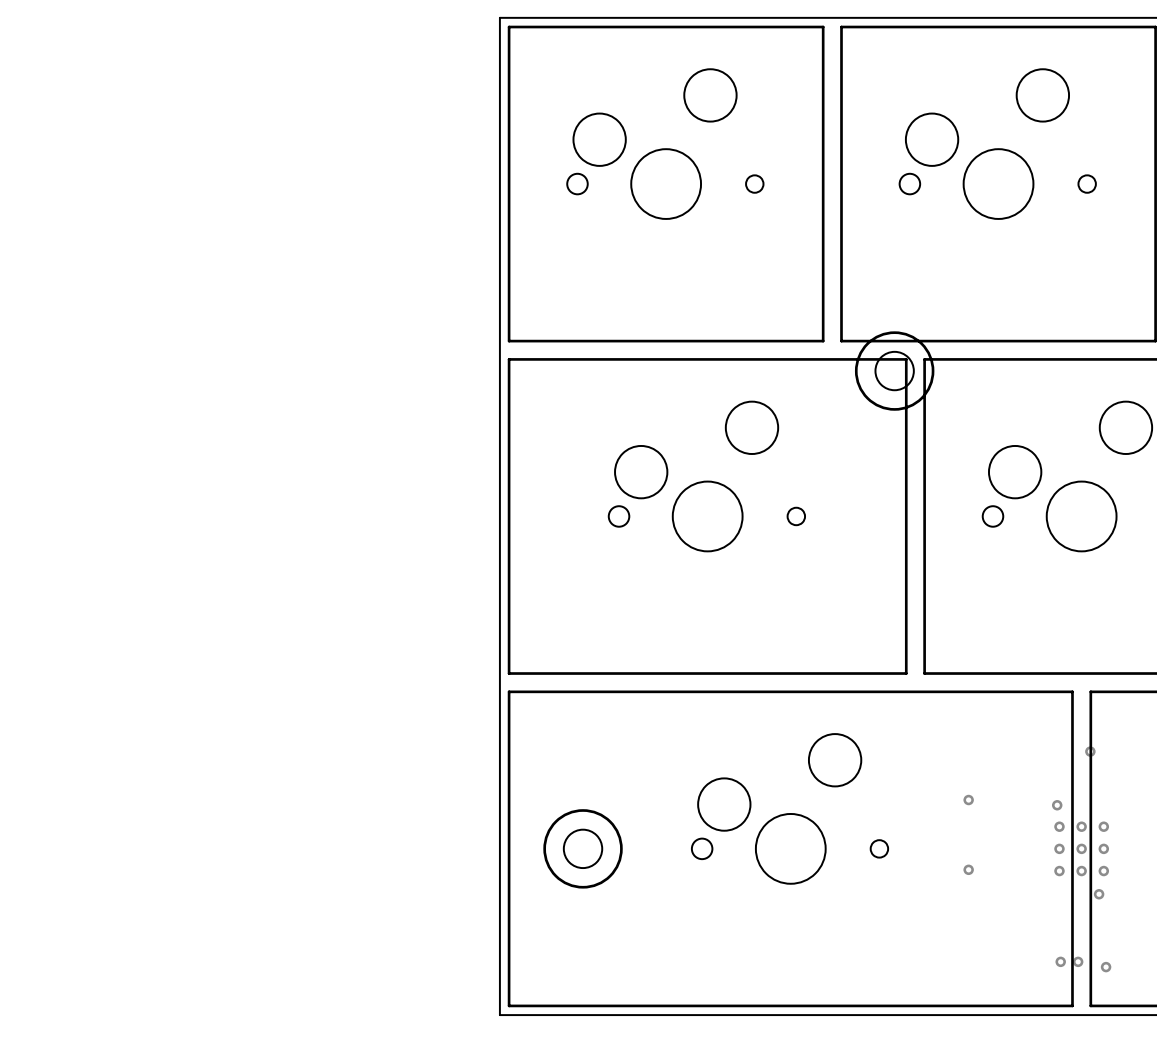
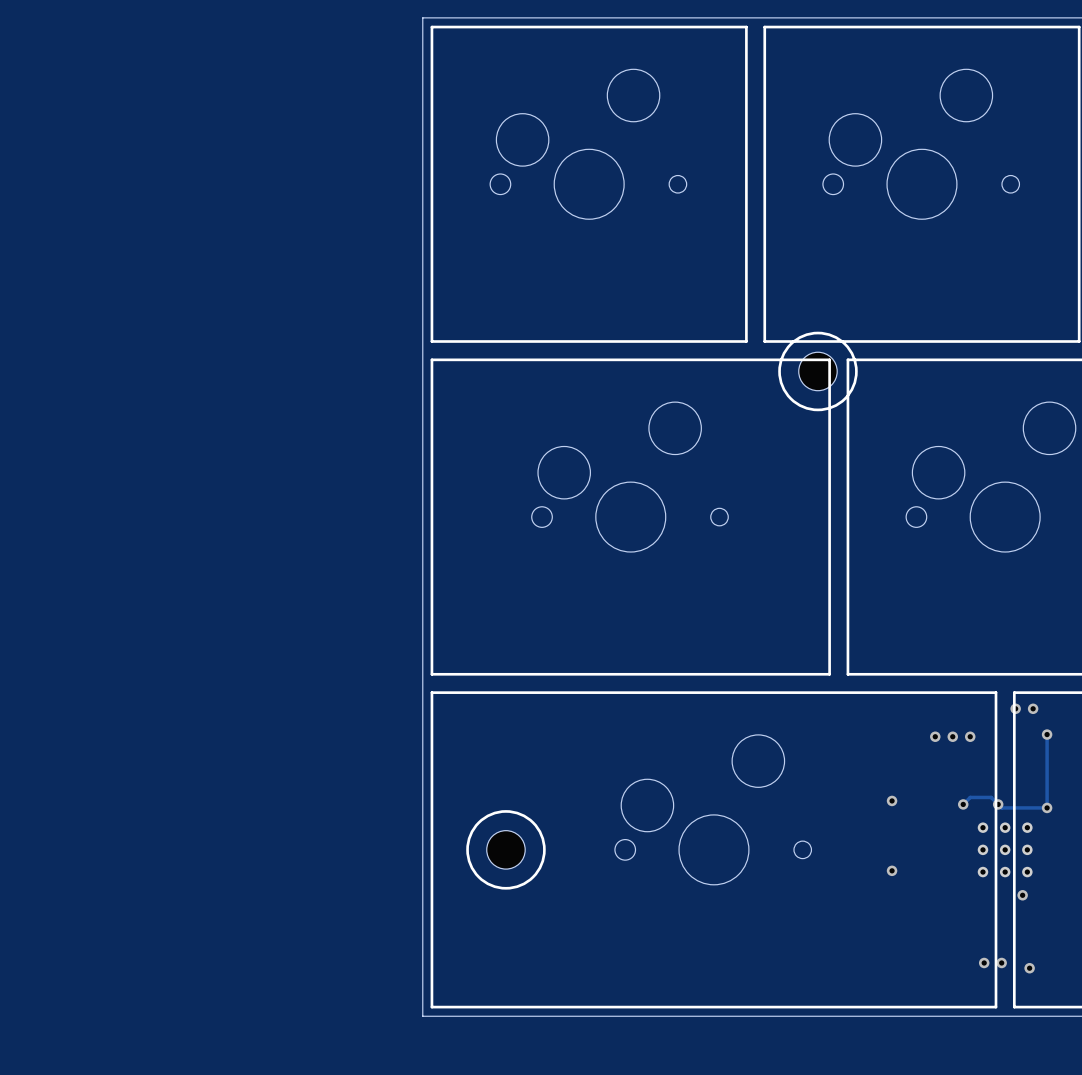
via: none -> (1015, 708)
via: none -> (1033, 708)
track: none -> (1047, 734) (1047, 807) (1001, 807) (991, 797) (970, 797) (963, 804)
via: none -> (1047, 734)
via: none -> (935, 736)
via: none -> (952, 736)
via: none -> (970, 736)
via: (1090, 751) -> none
via: none -> (963, 804)
via: none -> (998, 804)
via: (1057, 805) -> none
via: none -> (1047, 807)

